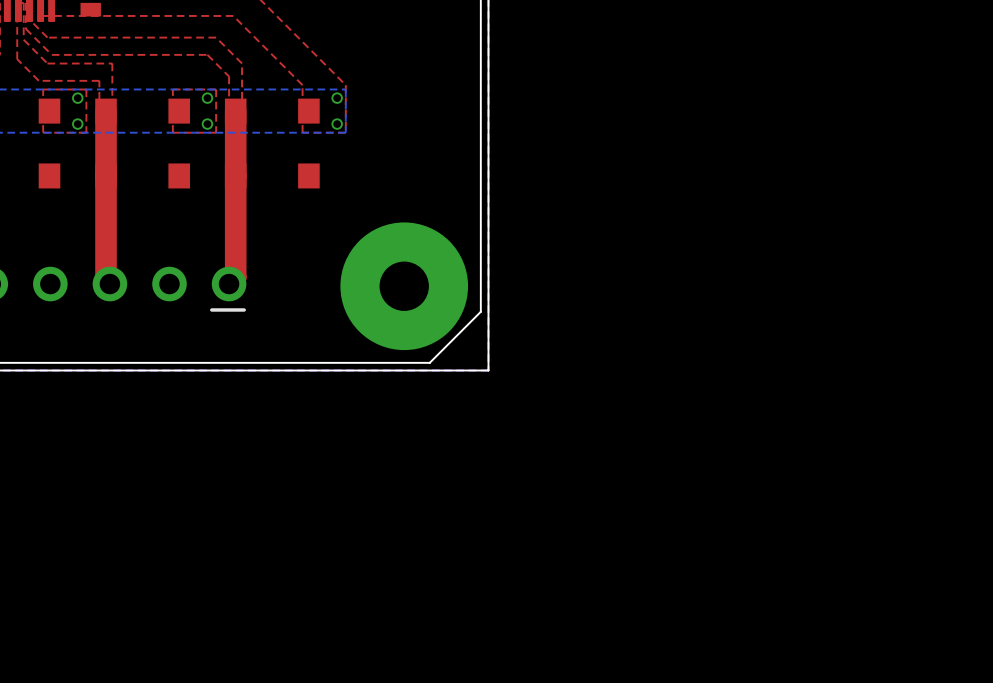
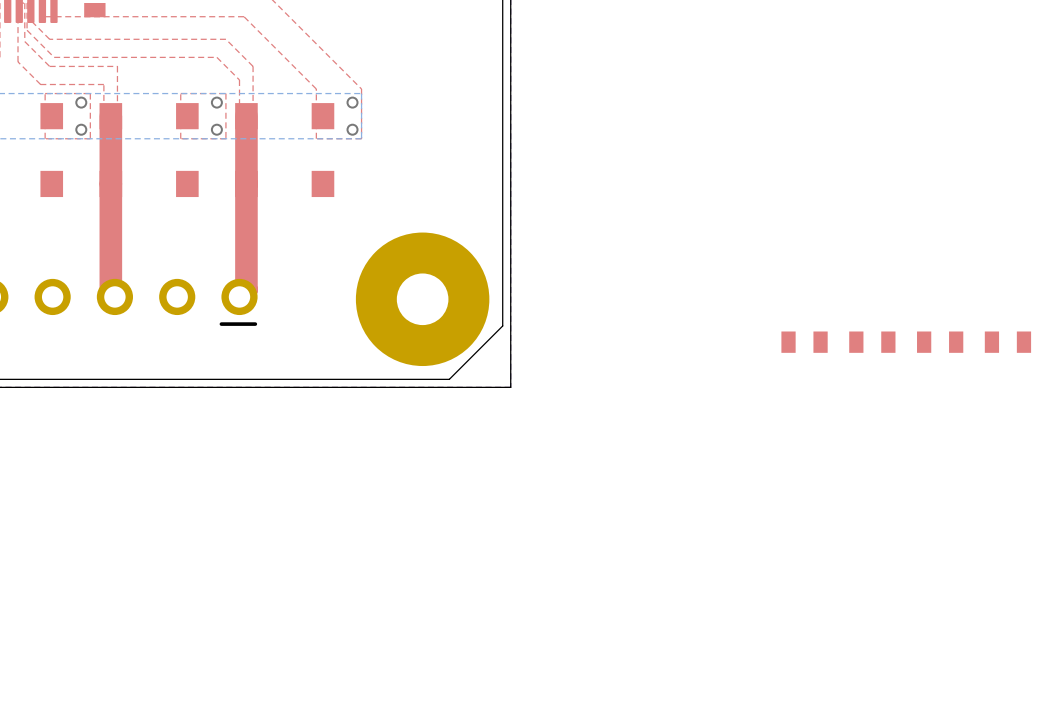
part: none -> (804, 342)
part: none -> (872, 342)
part: none -> (940, 342)
part: none -> (1007, 342)

